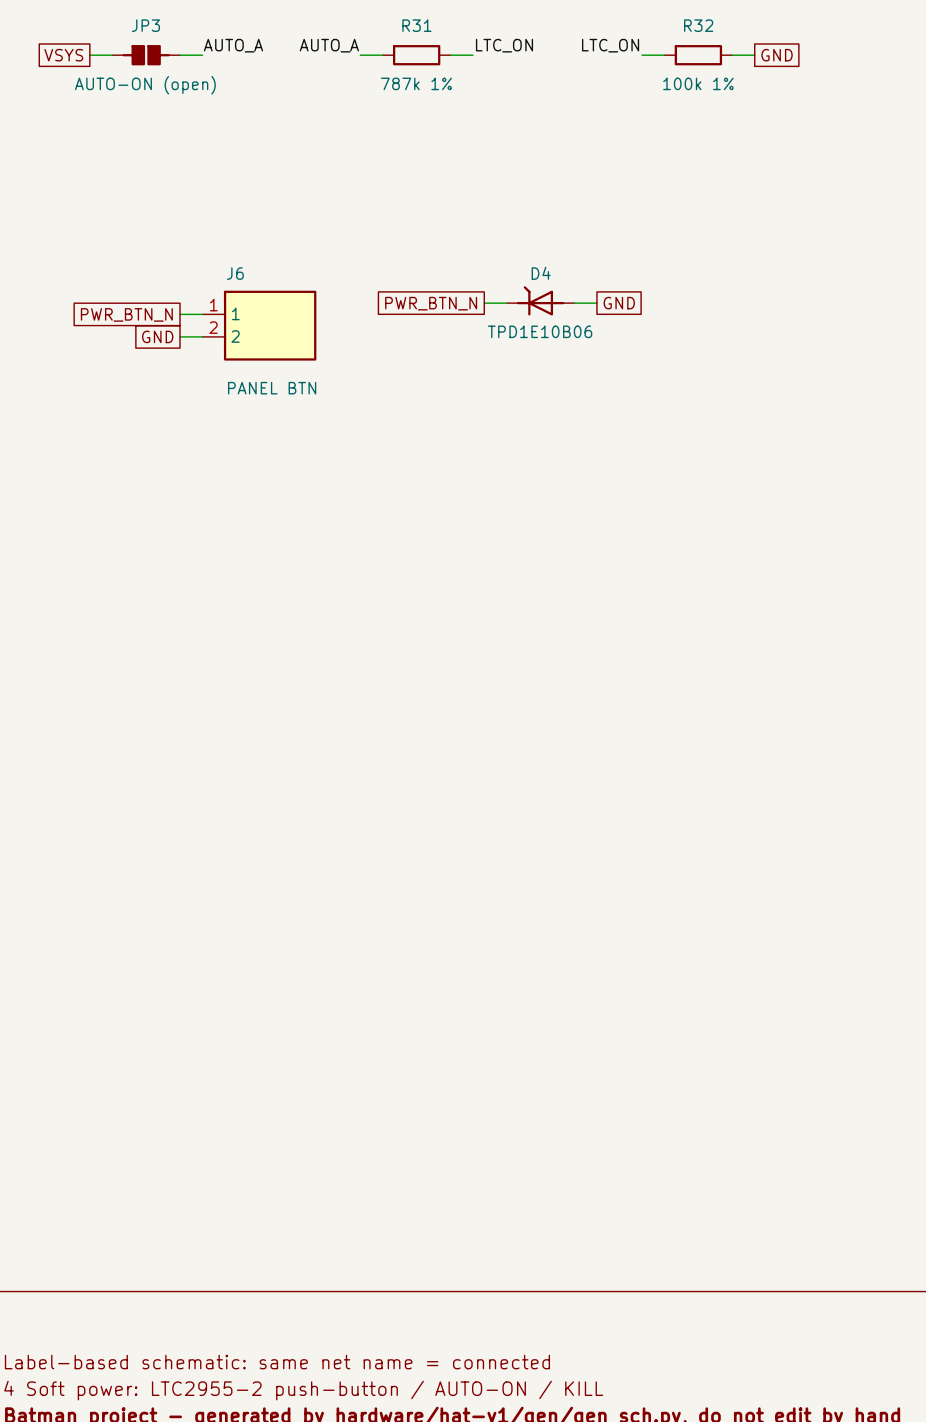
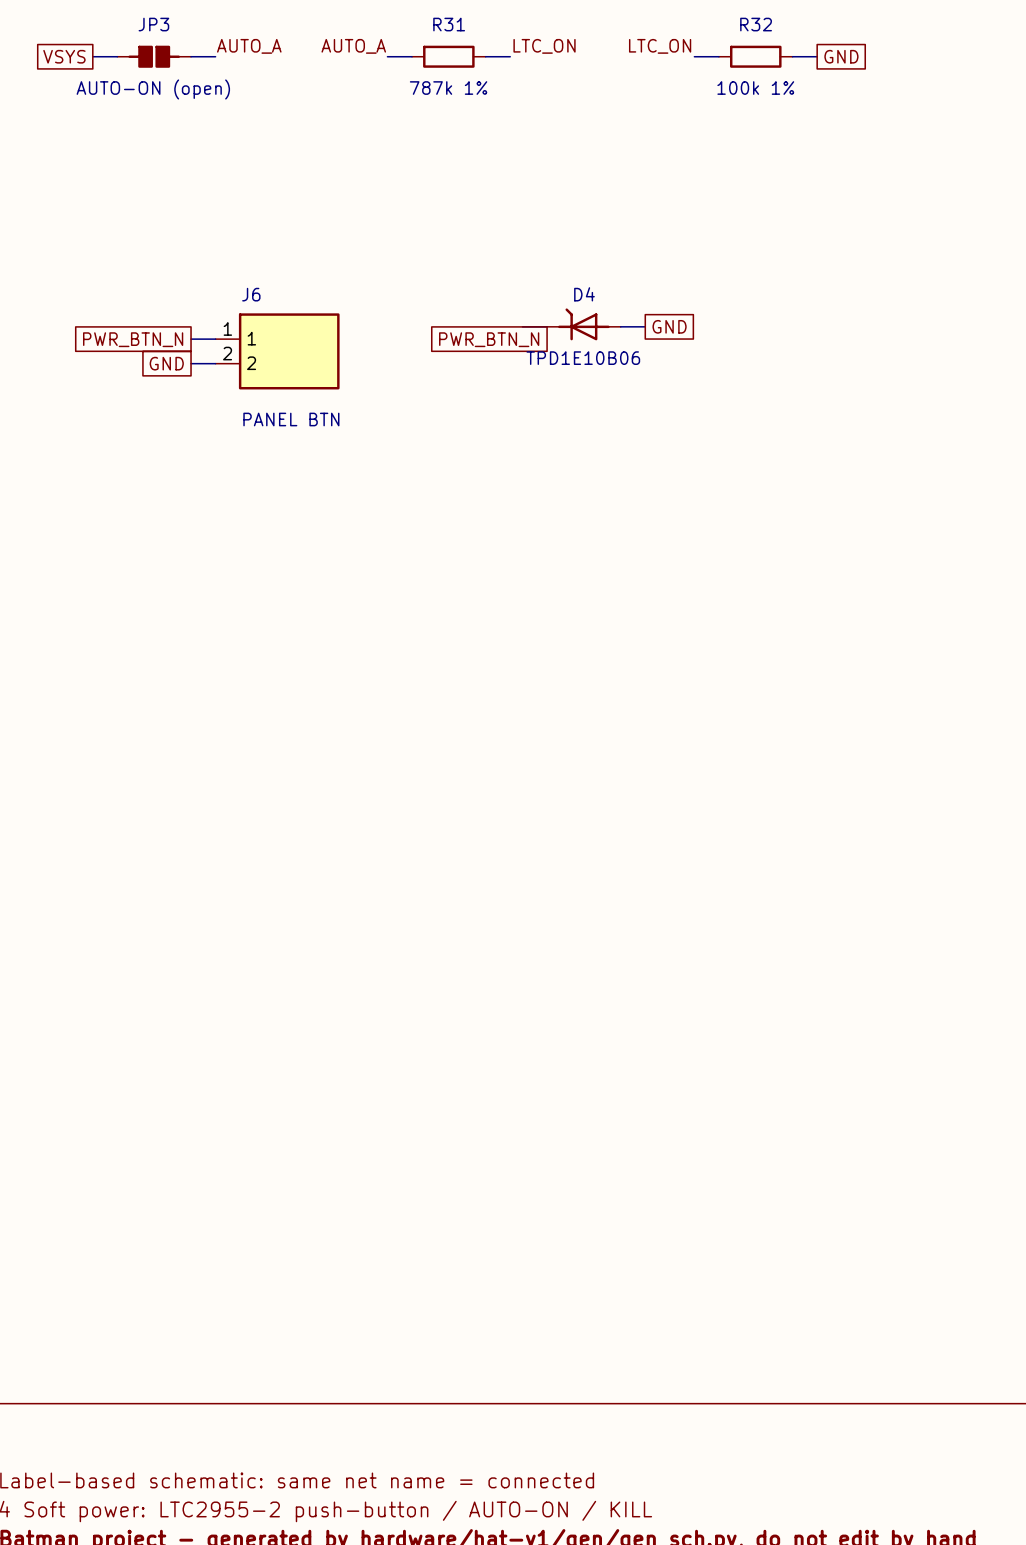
global label position: PWR_BTN_N (431, 303) -> PWR_BTN_N (489, 339)

